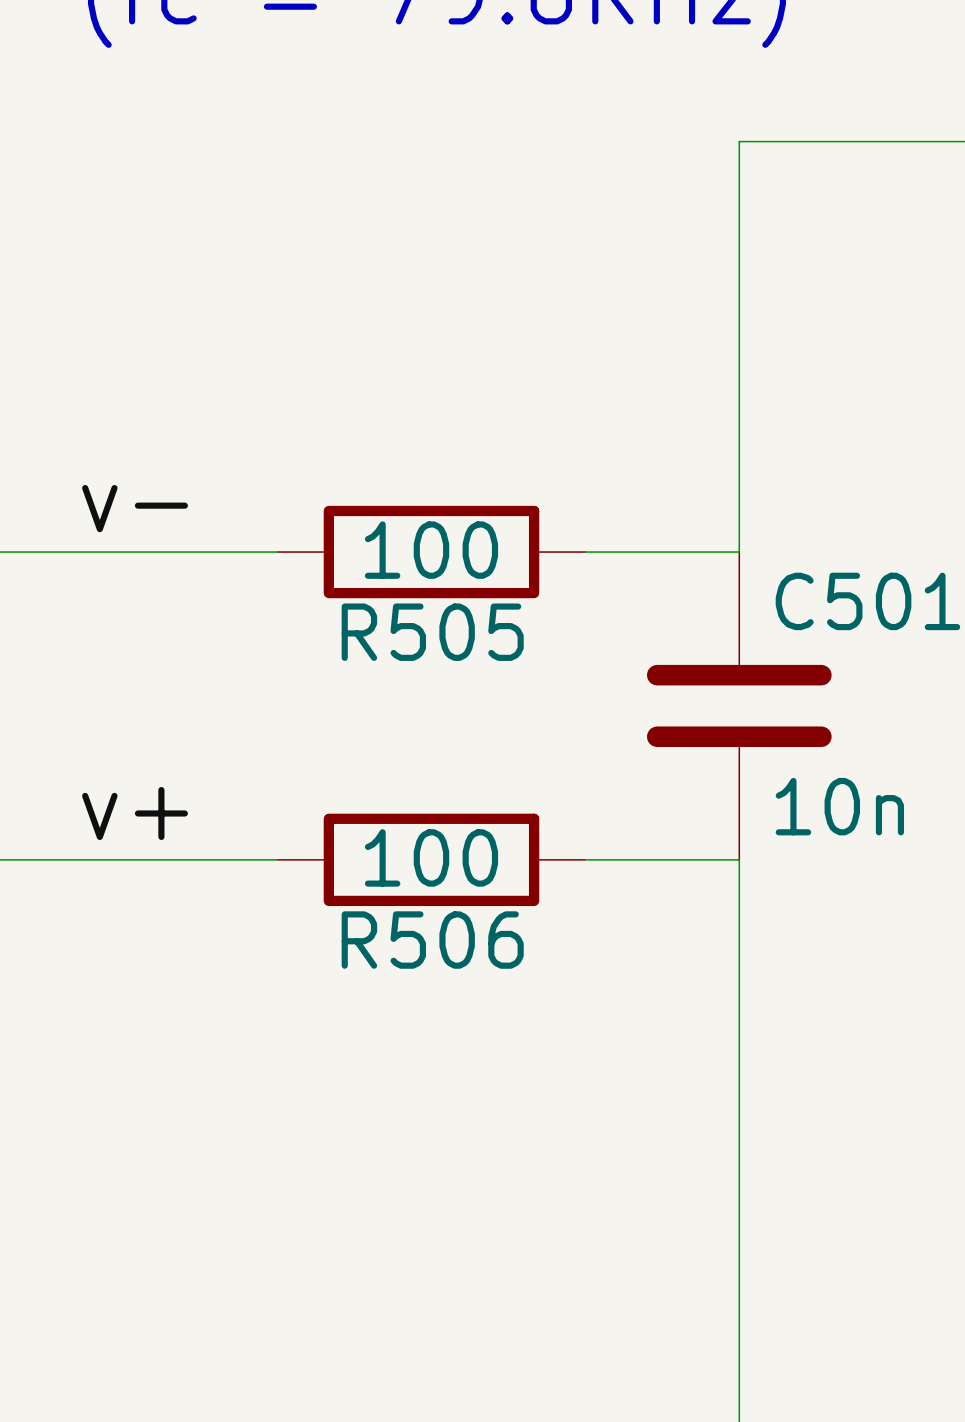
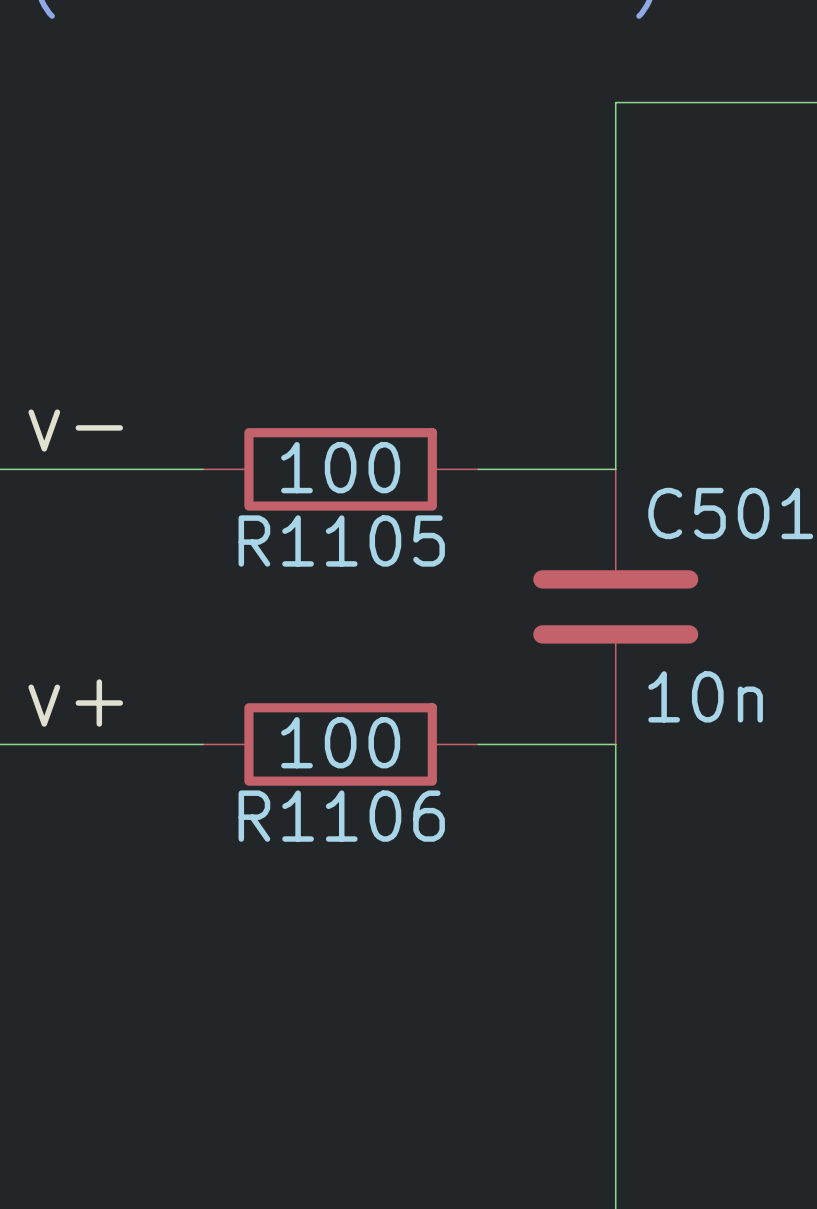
R505 name: R505 (432, 632) -> R1105 (341, 541)
R506 name: R506 (432, 940) -> R1106 (341, 816)

